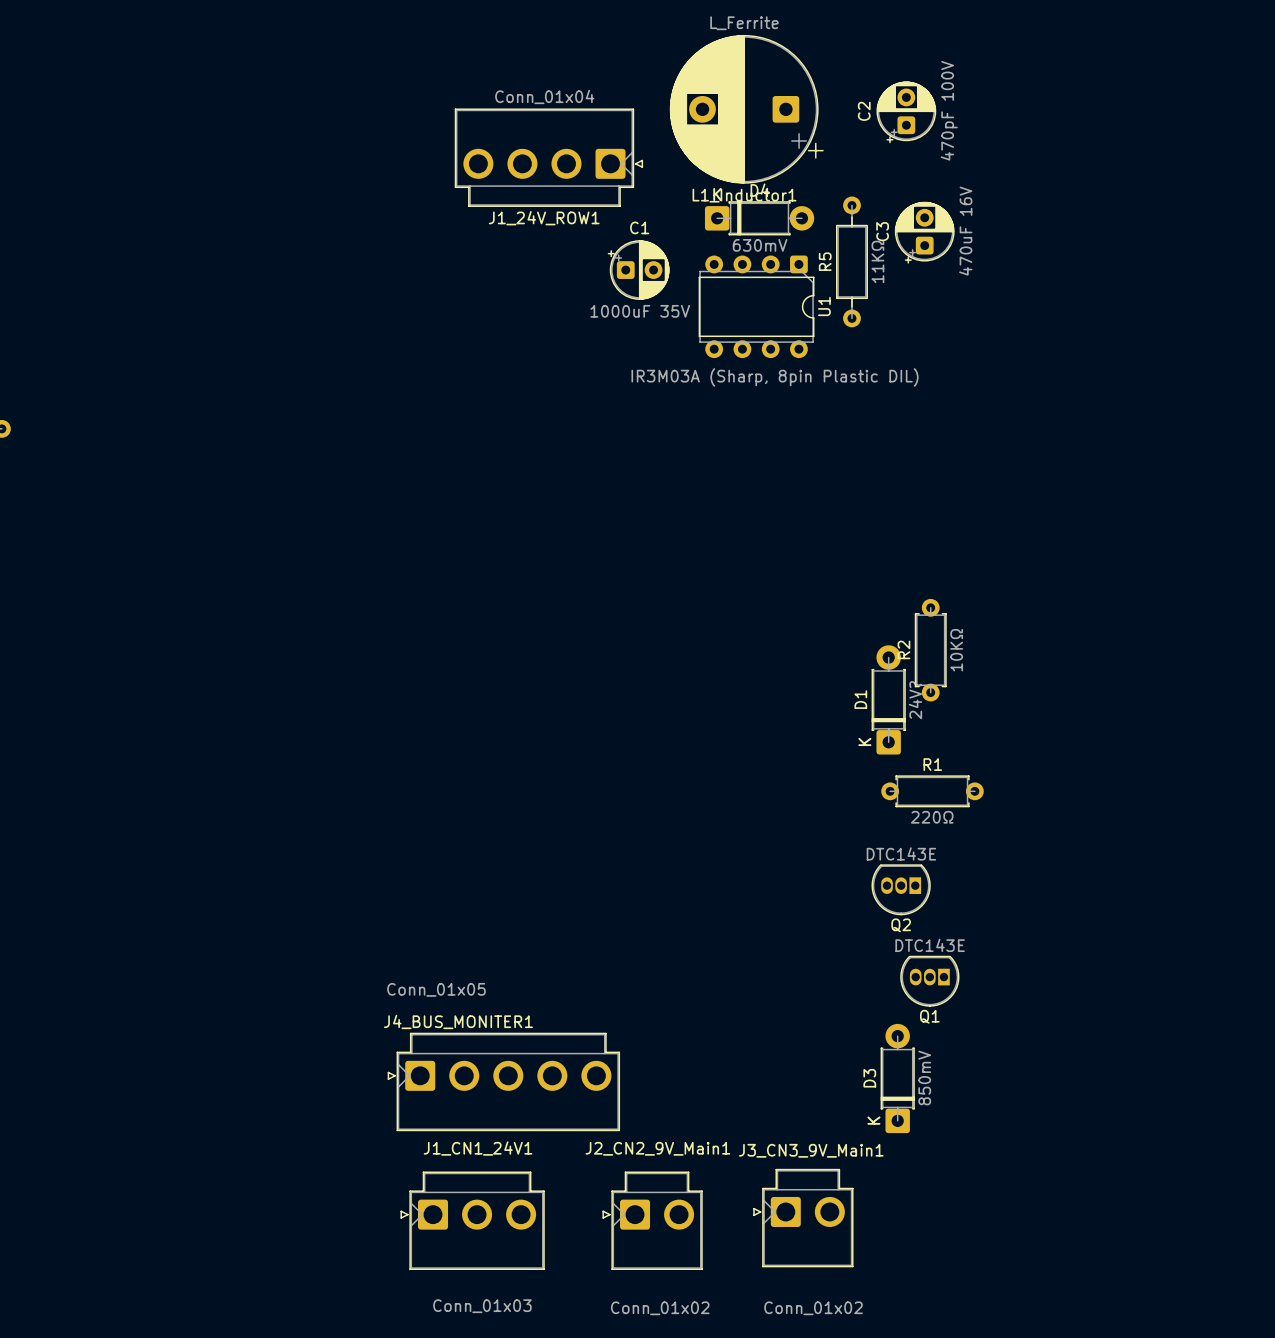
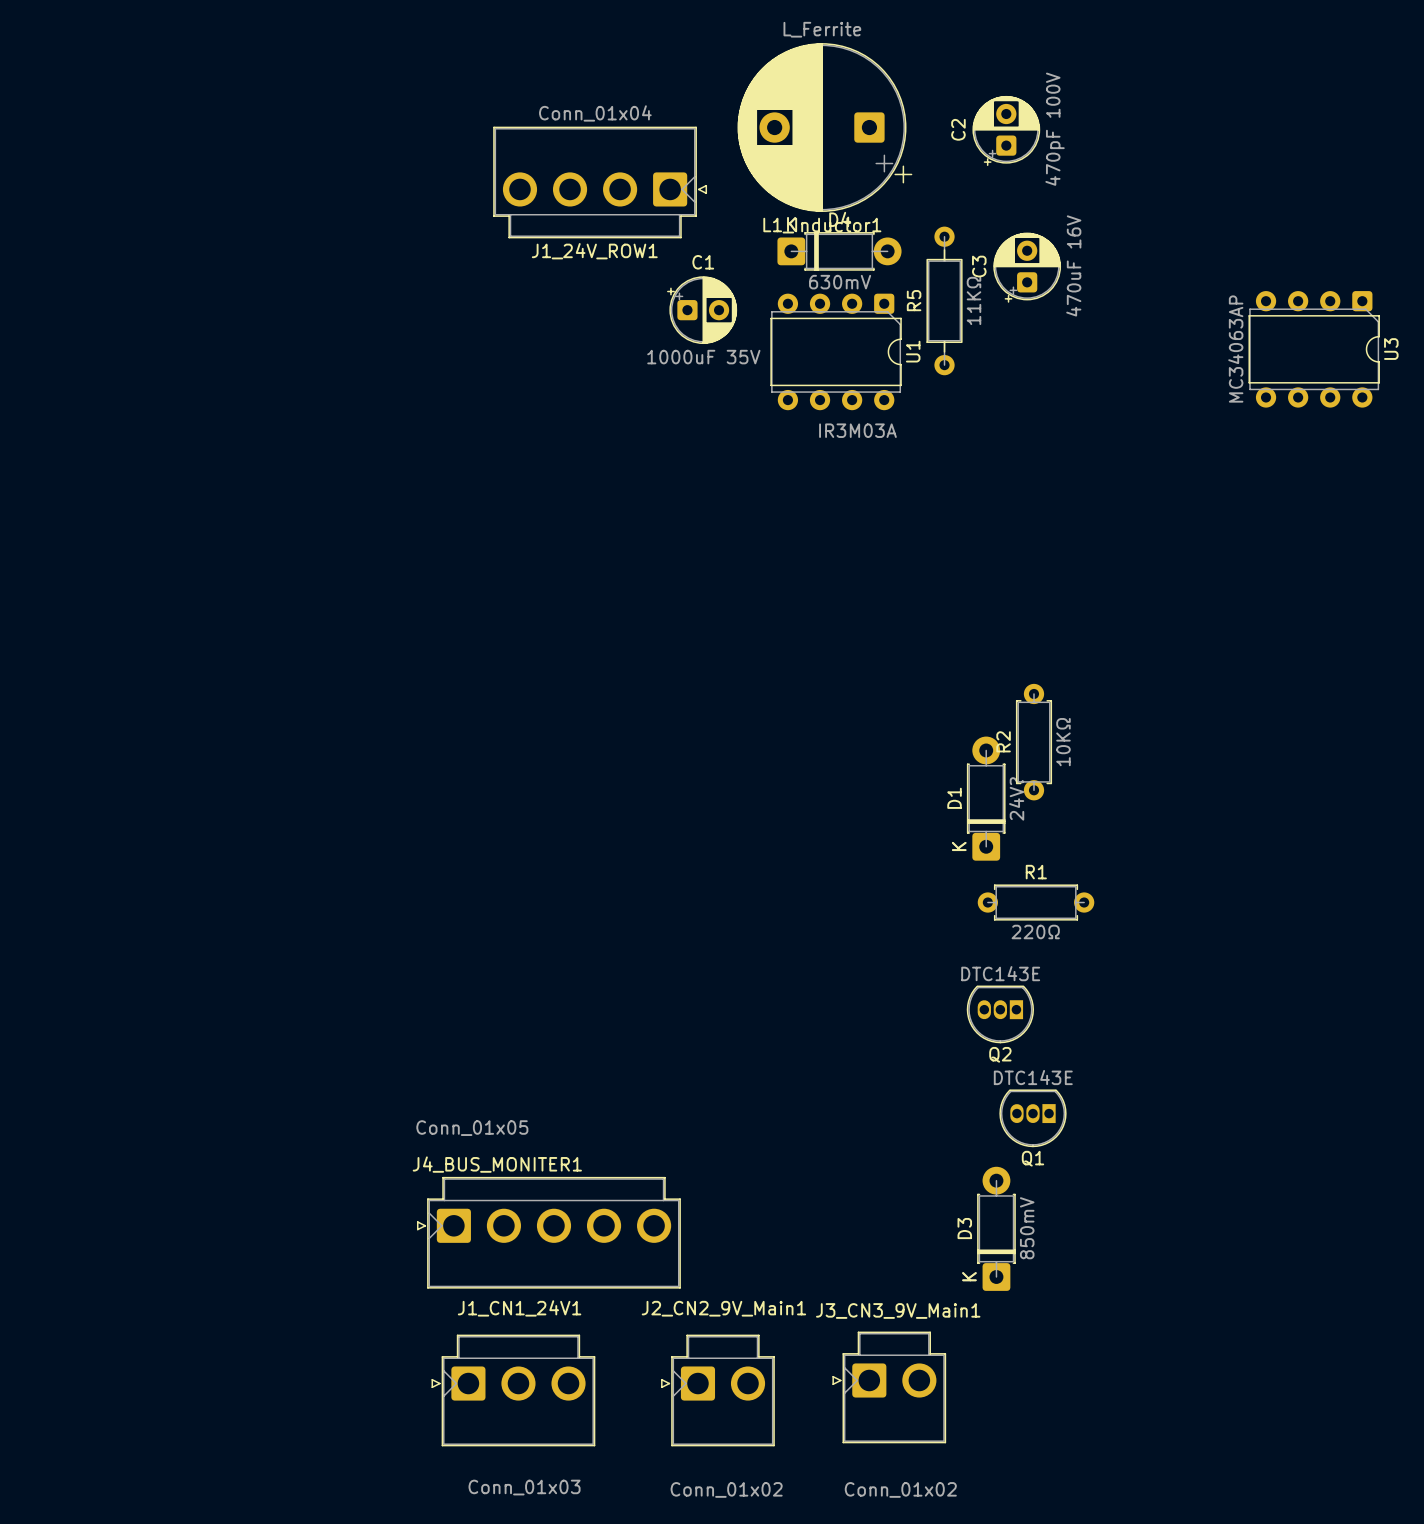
U3: none -> MC34063AP (1314, 349)
U1 value: IR3M03A (Sharp, 8pin Plastic DIL) (775, 377) -> IR3M03A (857, 430)

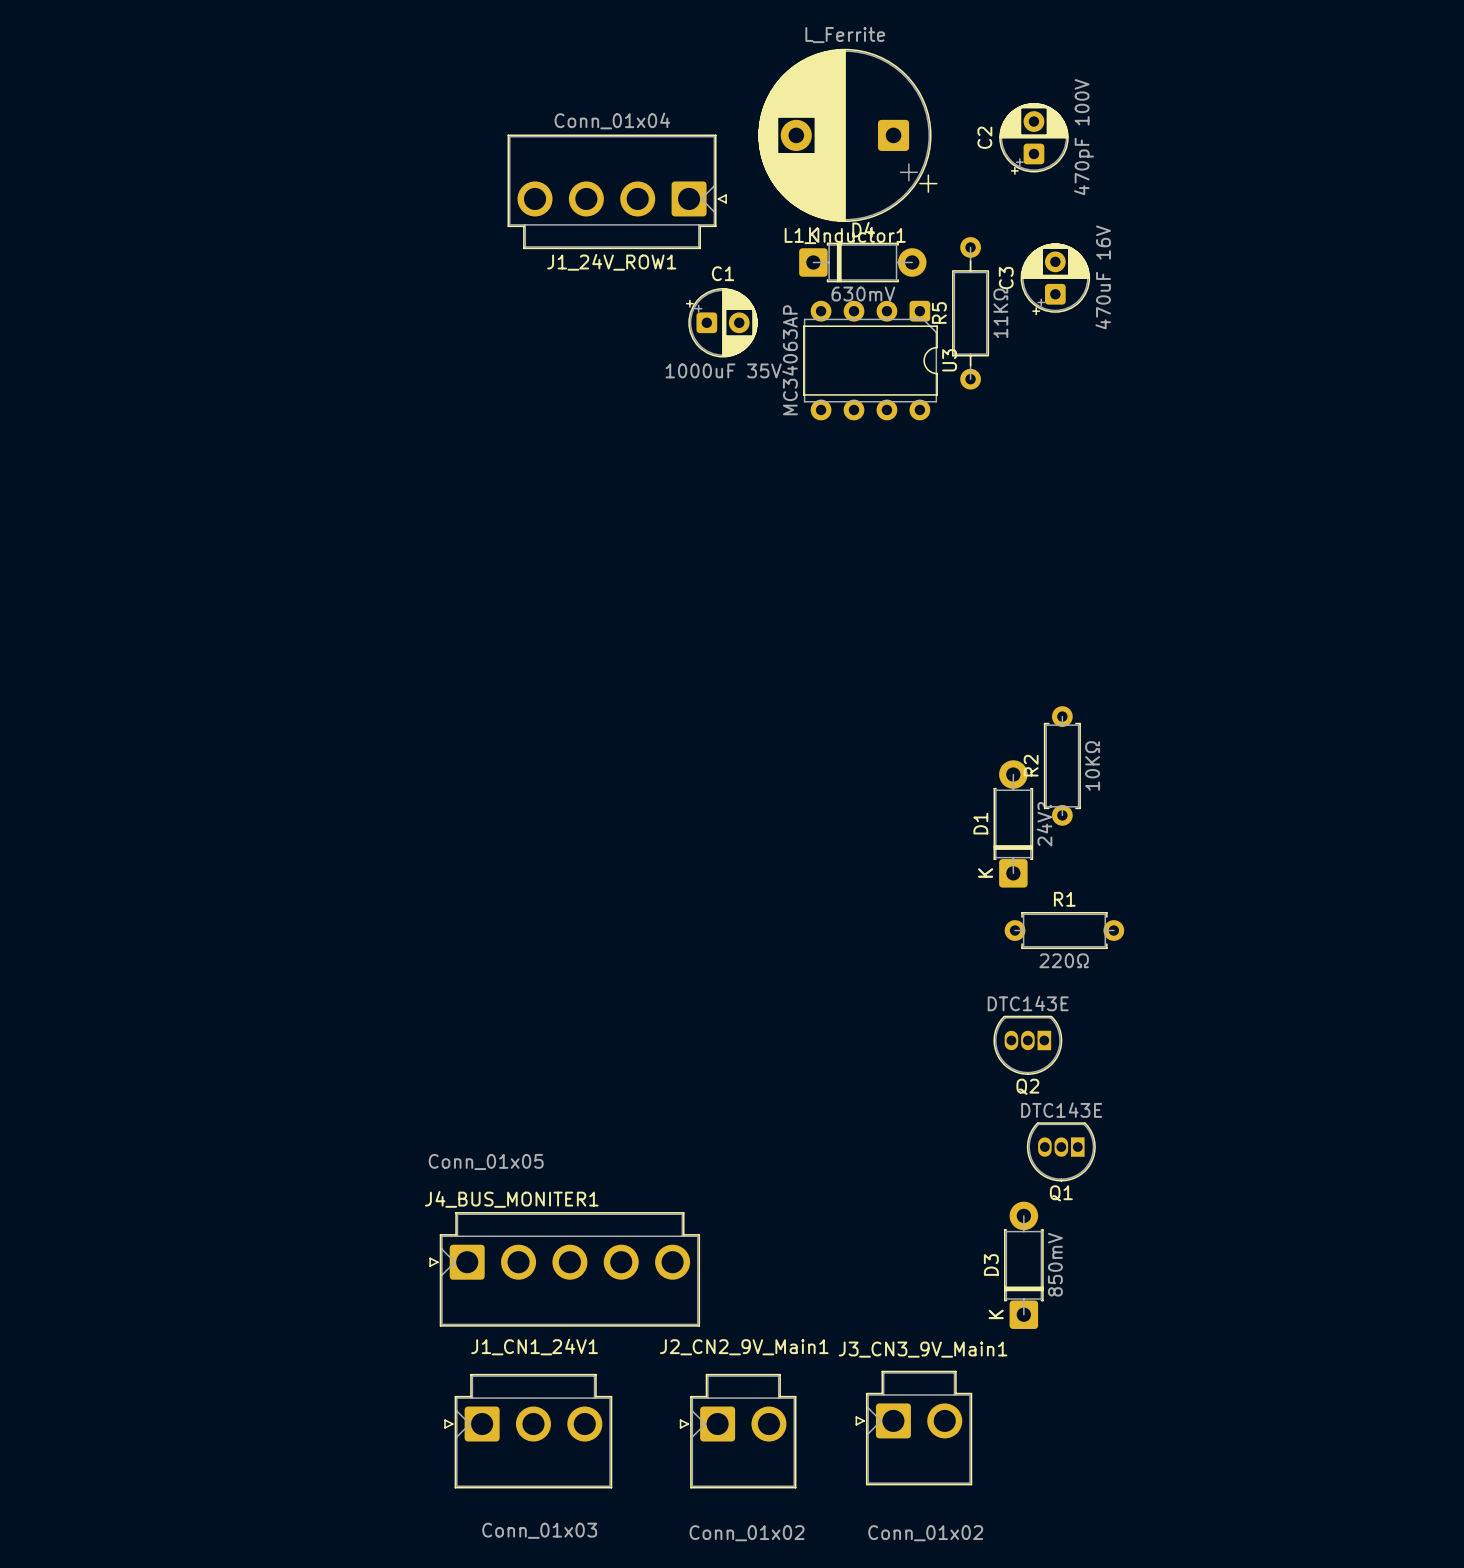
U3 position: (1314, 349) -> (870, 360)
U1: IR3M03A (836, 351) -> none

